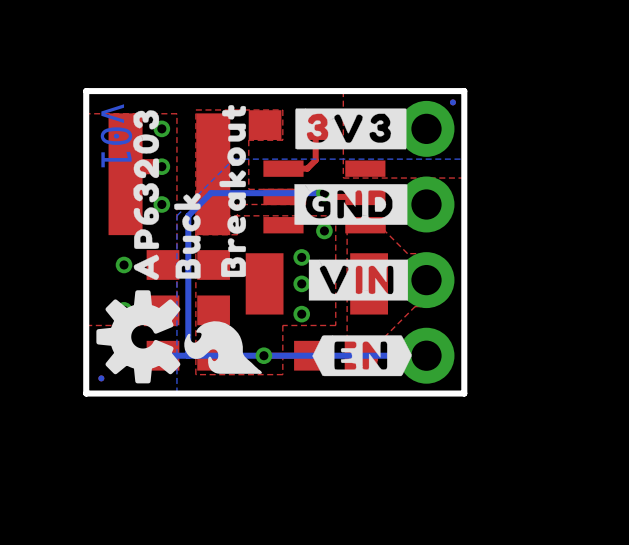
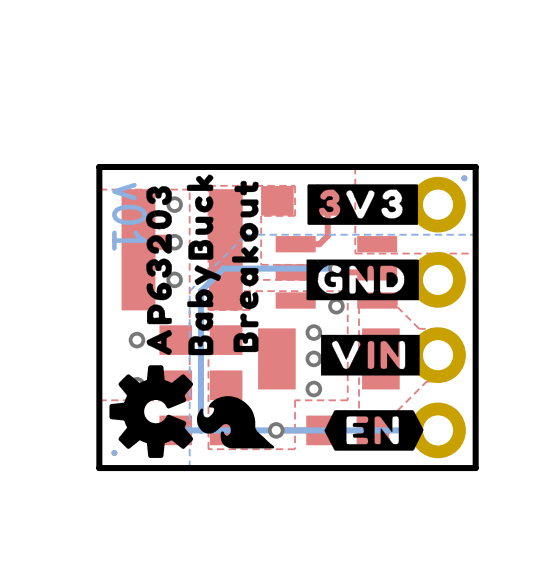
drawing: none -> [186, 174, 221, 356]
drawing: [174, 193, 201, 279] -> none

